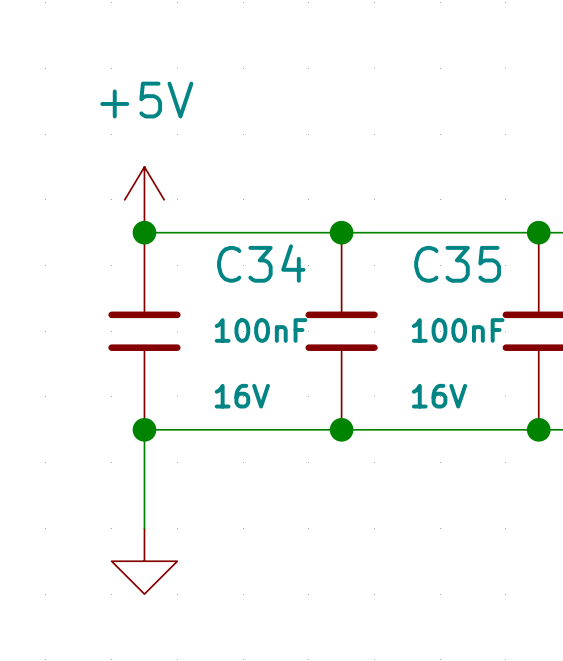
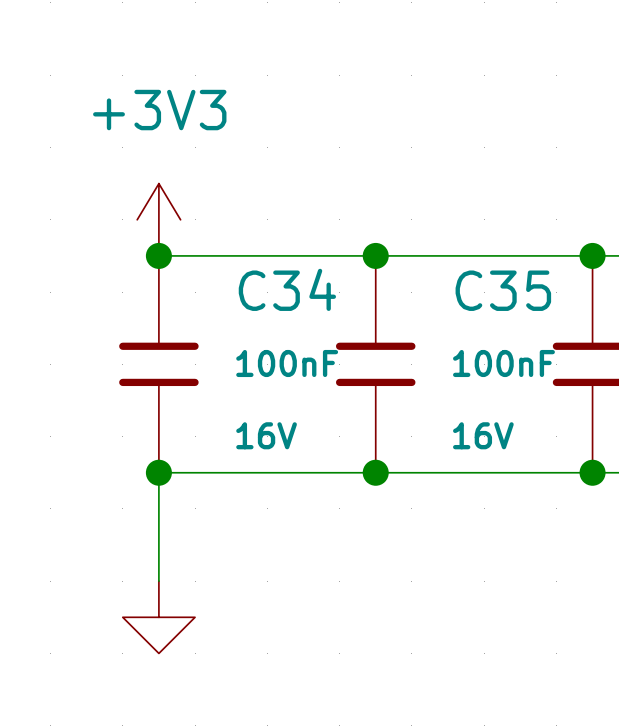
power symbol: +5V (144, 199) -> +3V3 (158, 219)

